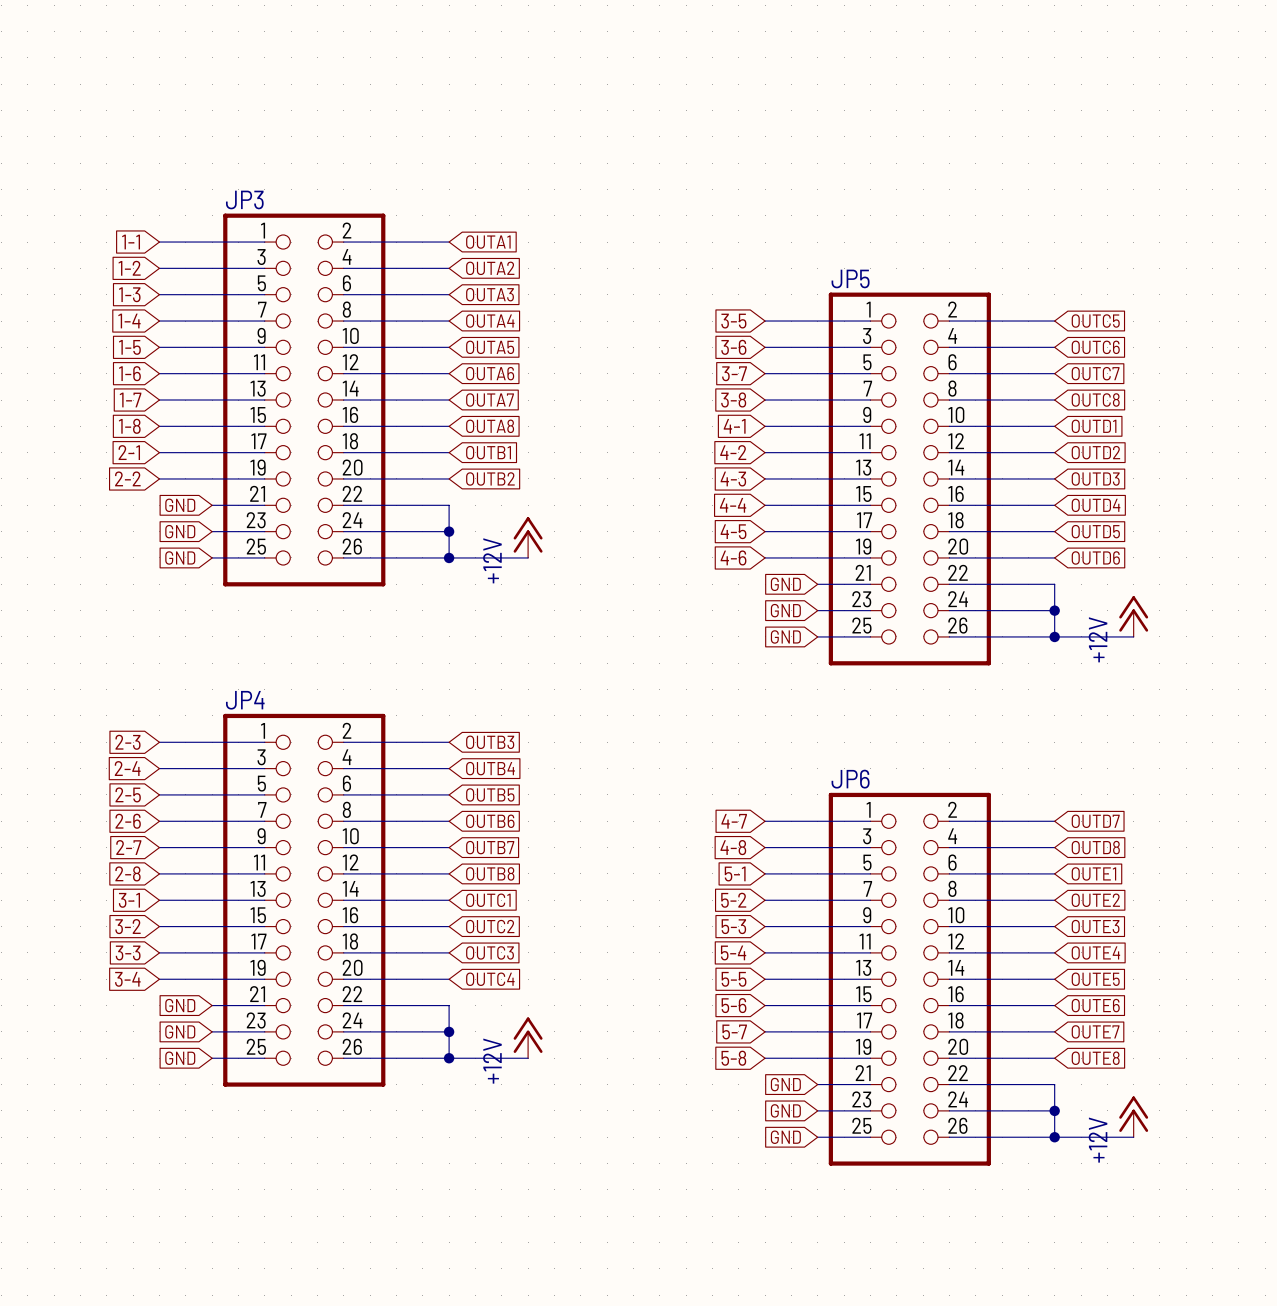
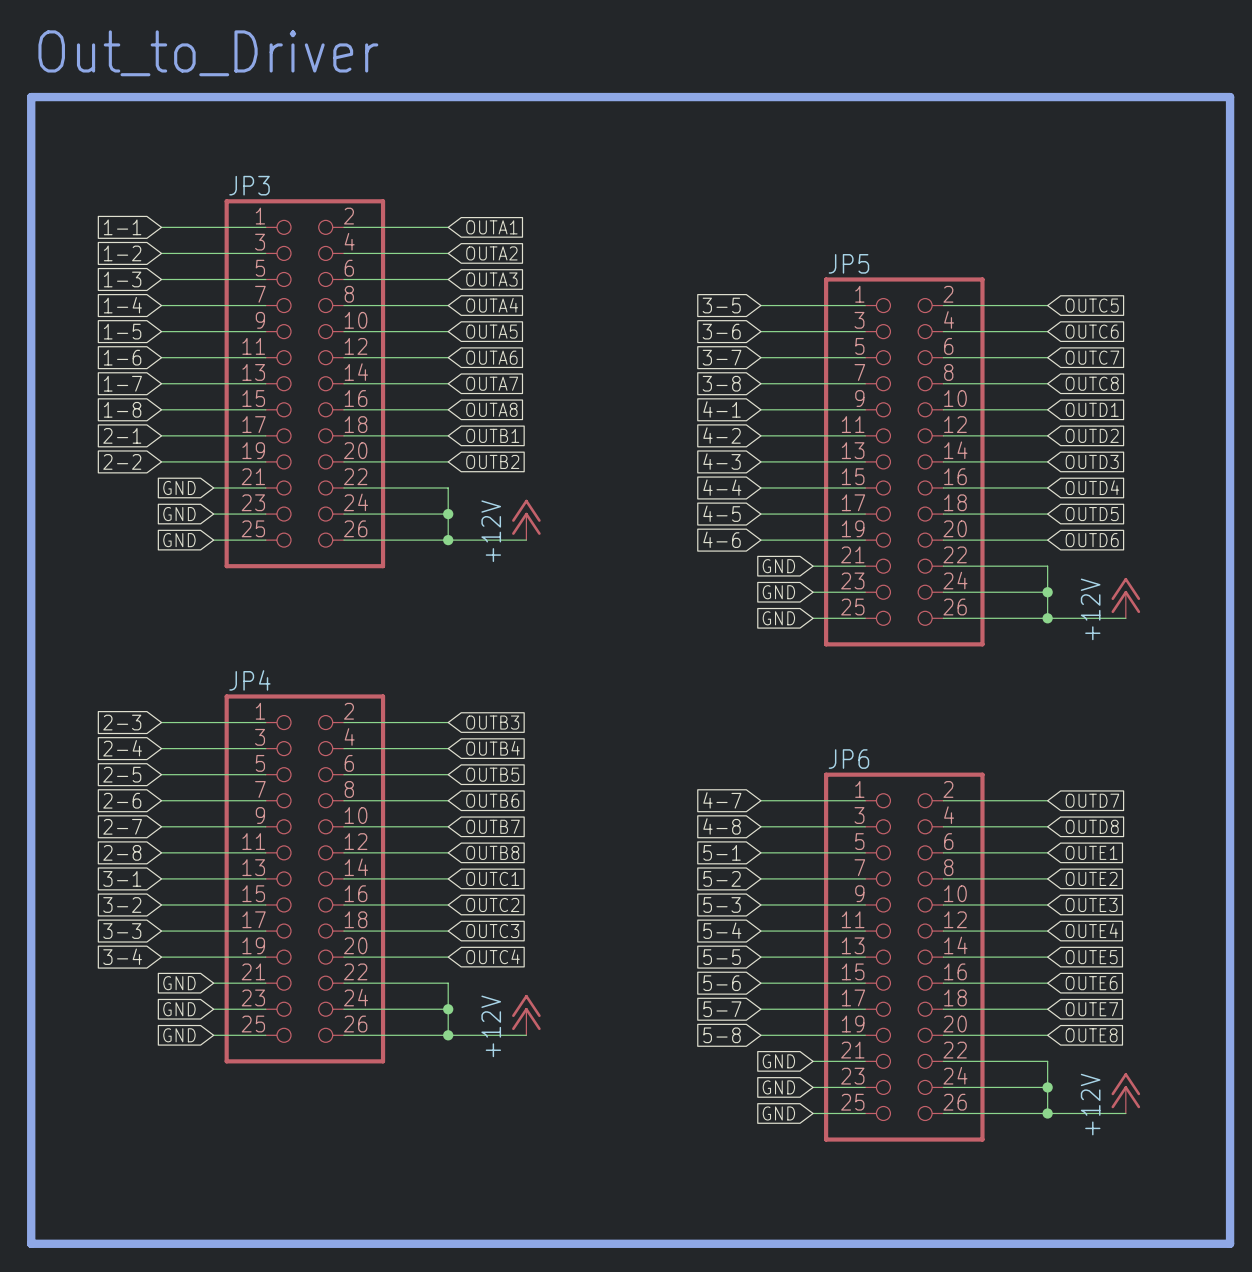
text: none -> Out_to_Driver (208, 53)
line: none -> (31, 97) (1230, 97) (1230, 1243) (31, 1243) (31, 97)

